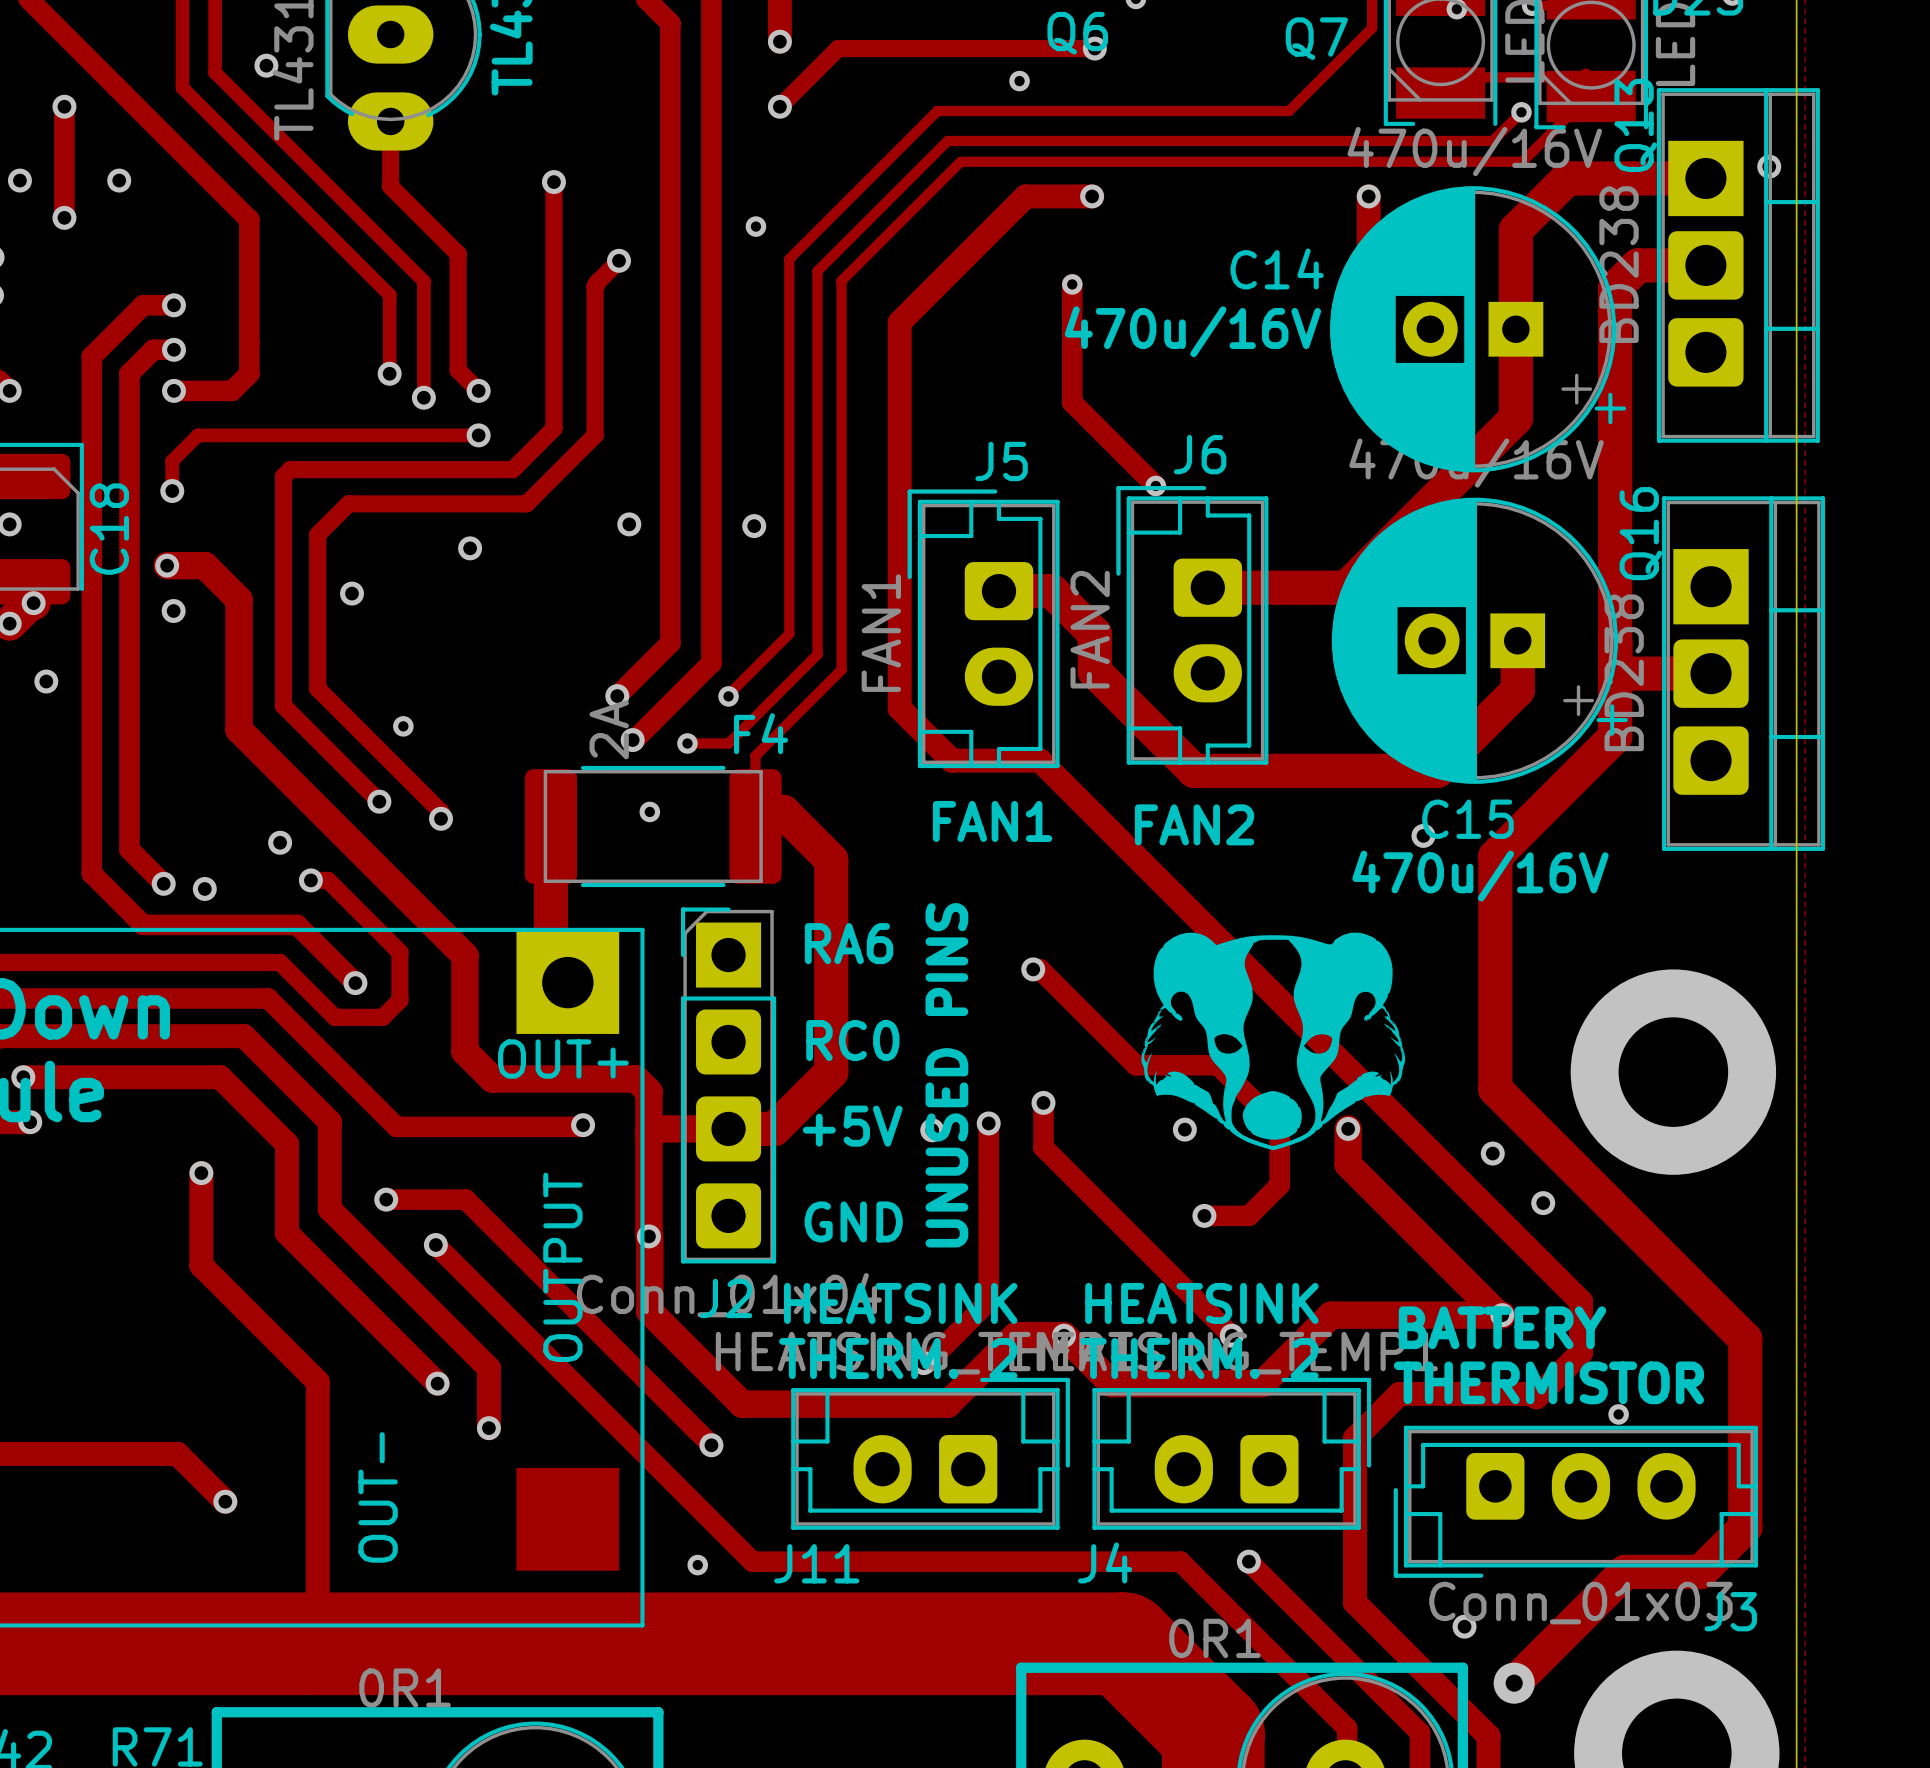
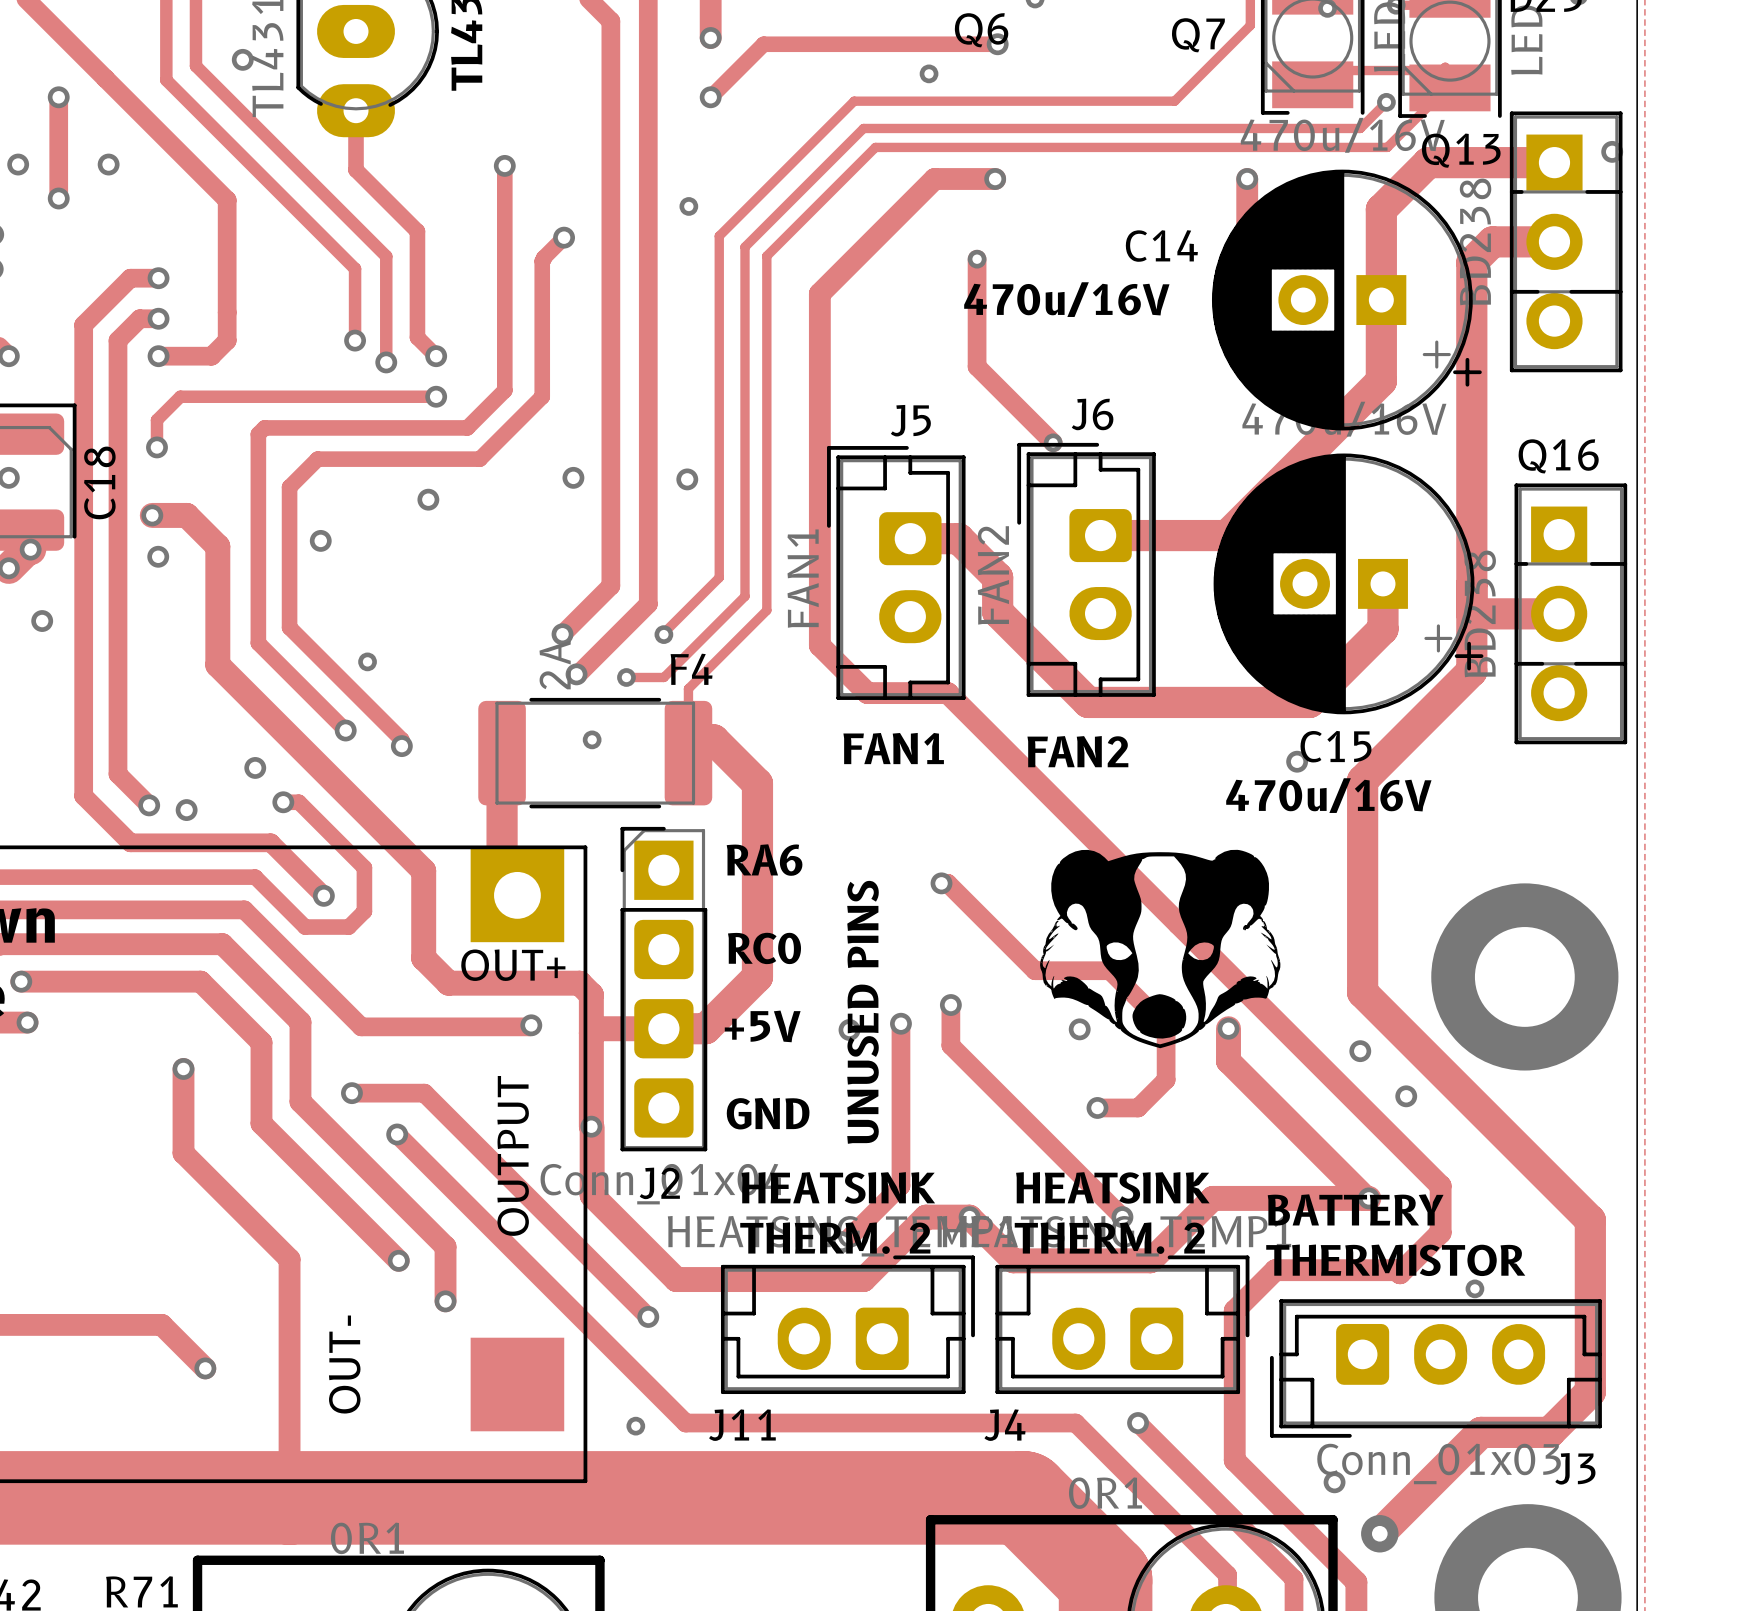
Q13 footprint: [1656, 88, 1820, 443] -> [1509, 111, 1623, 373]
Q16 footprint: [1662, 496, 1826, 851] -> [1514, 483, 1628, 745]
Q16 name position: Q16 (1640, 533) -> Q16 (1558, 456)

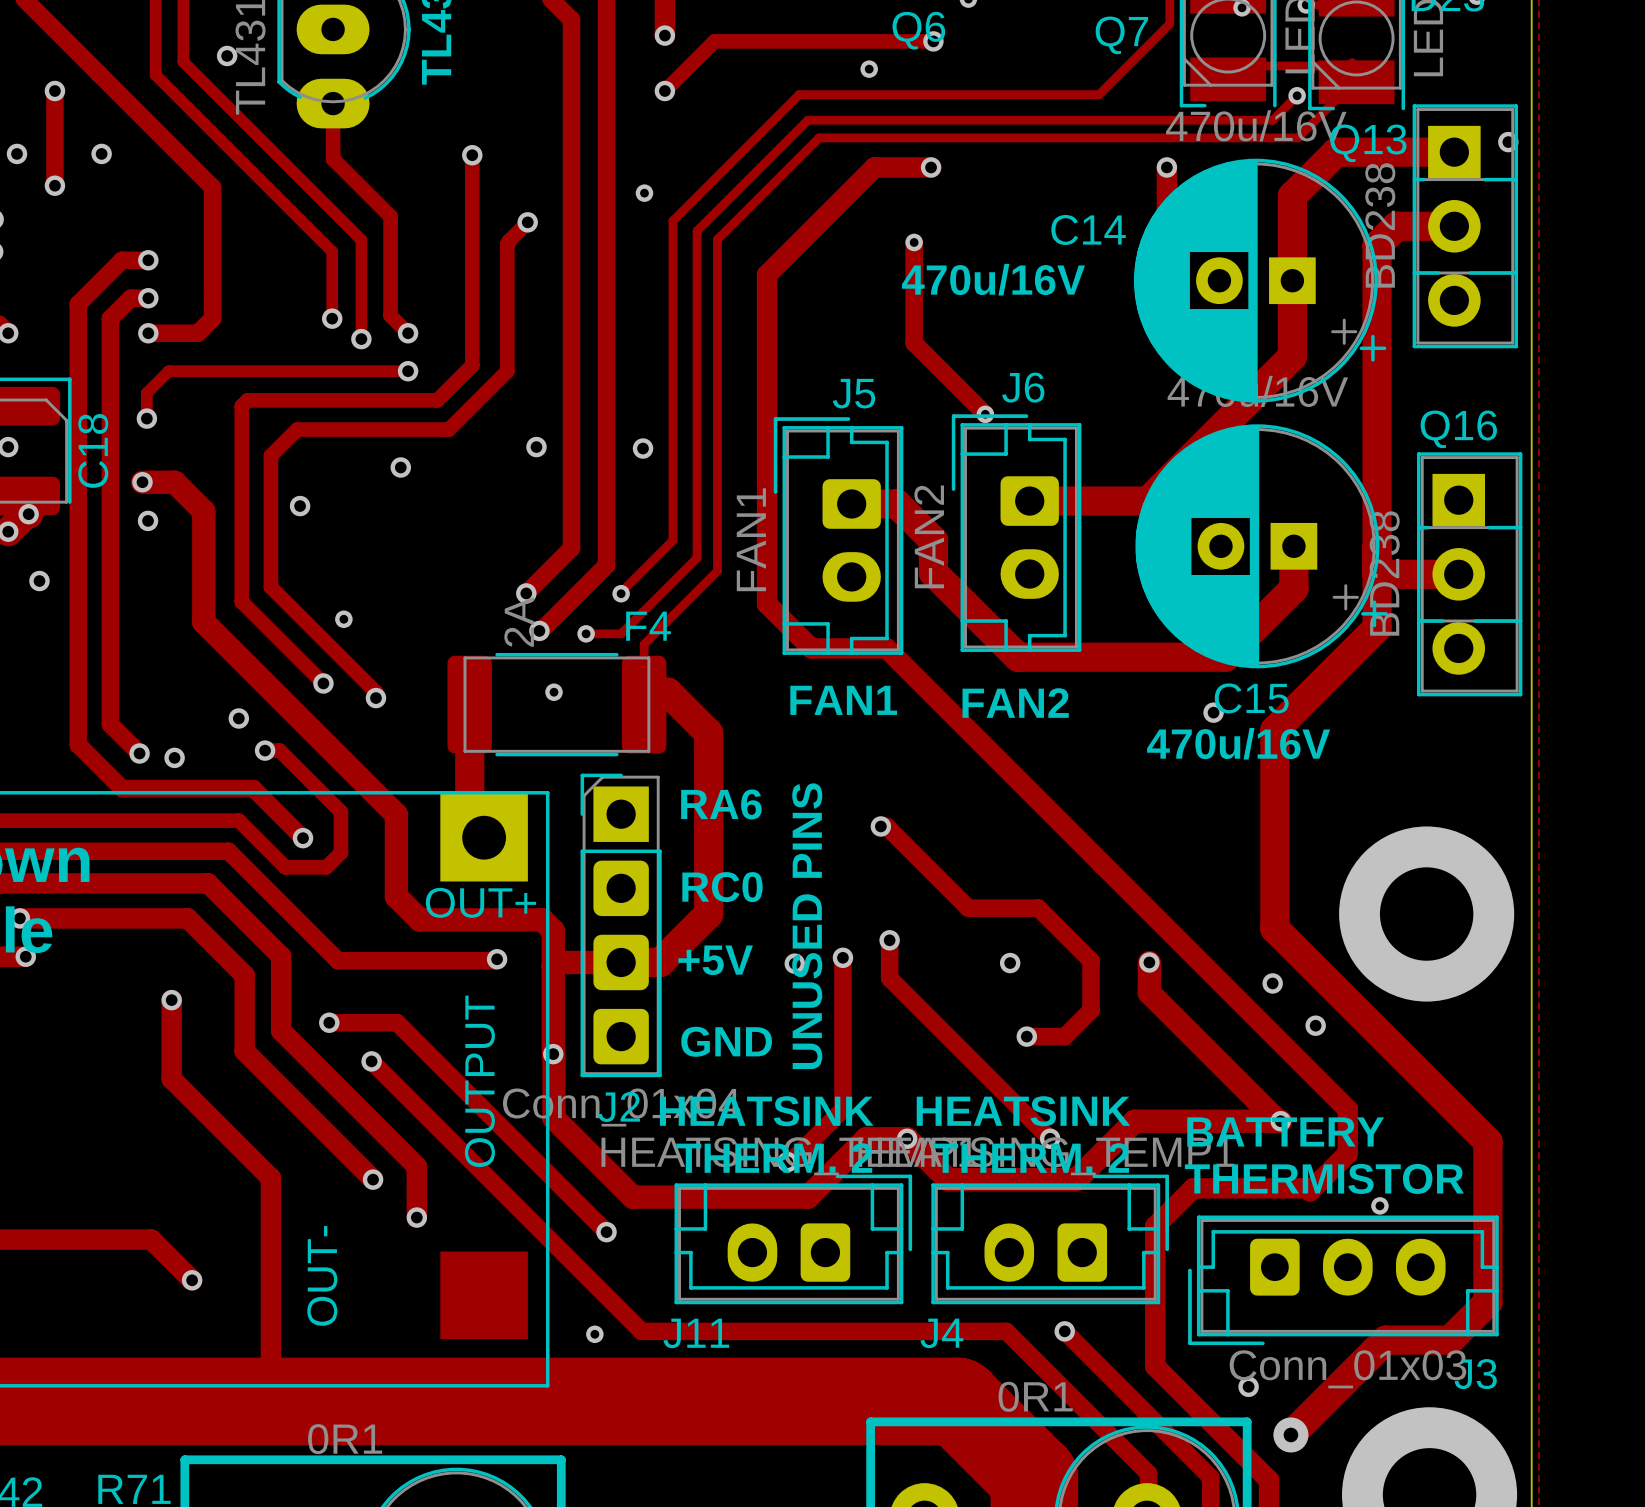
drawing: [1040, 849, 1281, 1049] -> none

